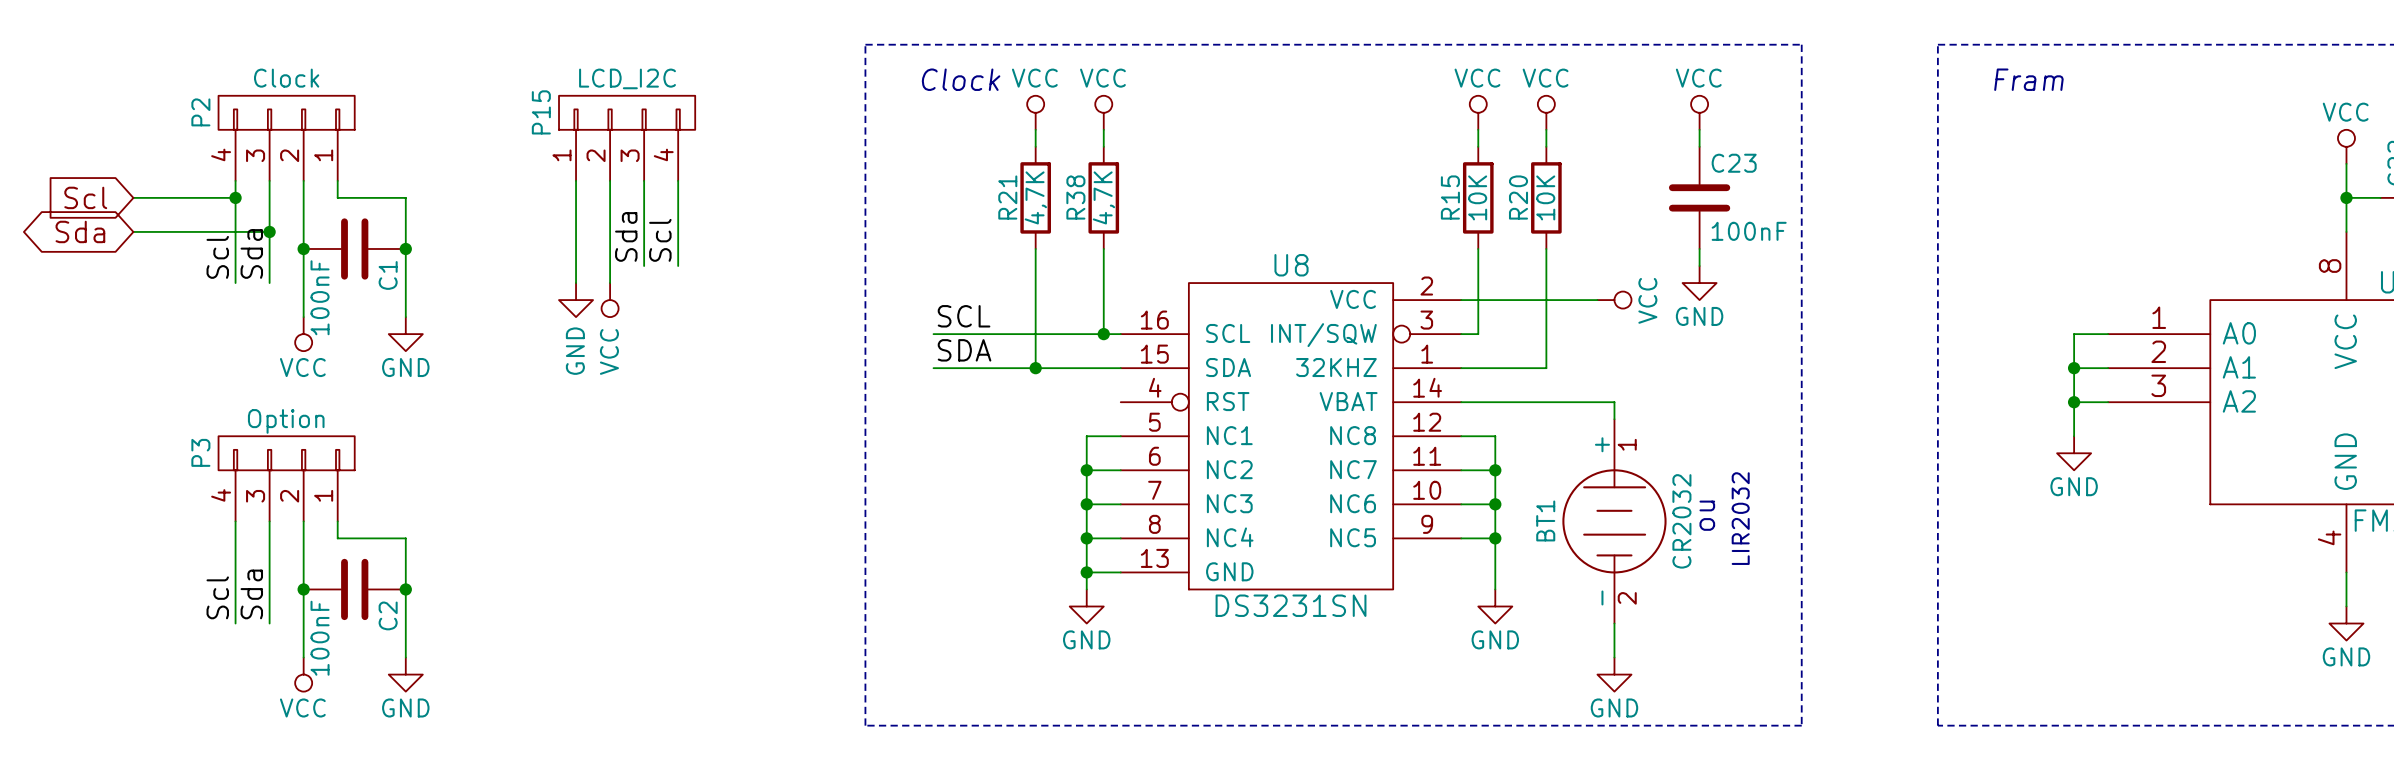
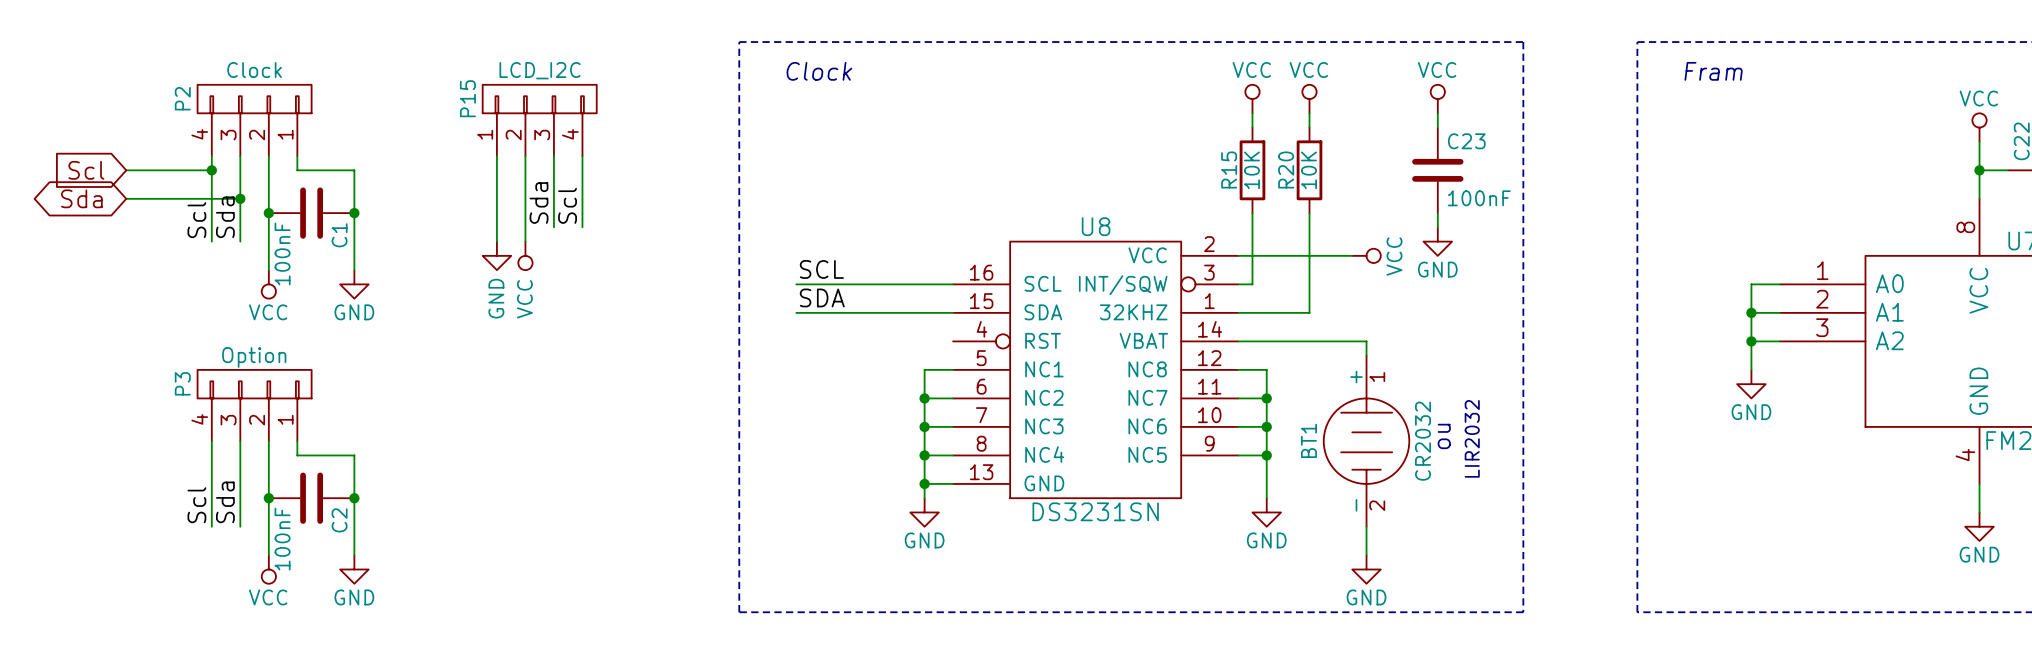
power symbol: VCC (1035, 112) -> none
power symbol: VCC (1103, 112) -> none
wire: (1035, 129) (1035, 146) -> none
wire: (1103, 129) (1103, 146) -> none
R21: 4,7K (1035, 197) -> none
R38: 4,7K (1103, 197) -> none
wire: (1035, 248) (1035, 368) -> none
wire: (1103, 248) (1103, 334) -> none
junction: (1103, 334) -> none
junction: (1035, 368) -> none

